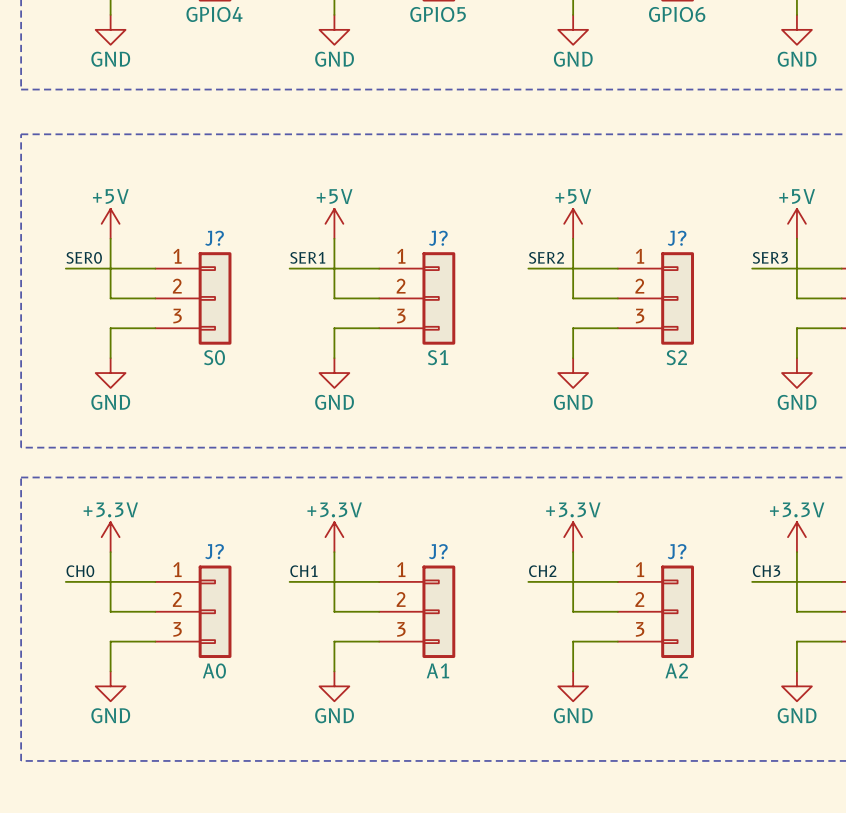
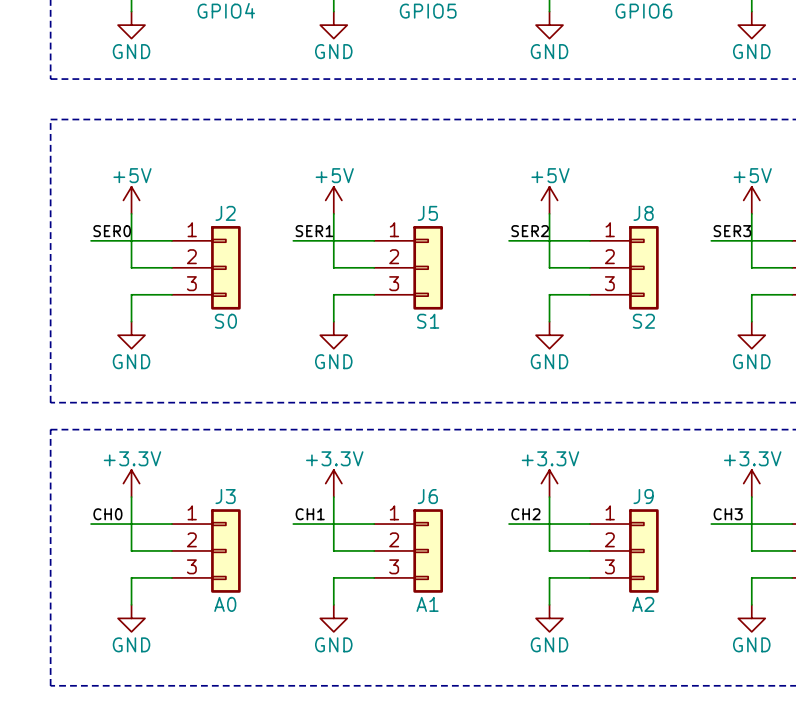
J? name: J? (214, 238) -> J2 (225, 213)
J? name: J? (438, 238) -> J5 (427, 213)
J? name: J? (677, 238) -> J8 (643, 213)
J? name: J? (214, 551) -> J3 (225, 496)
J? name: J? (438, 551) -> J6 (427, 496)
J? name: J? (677, 551) -> J9 (643, 496)

